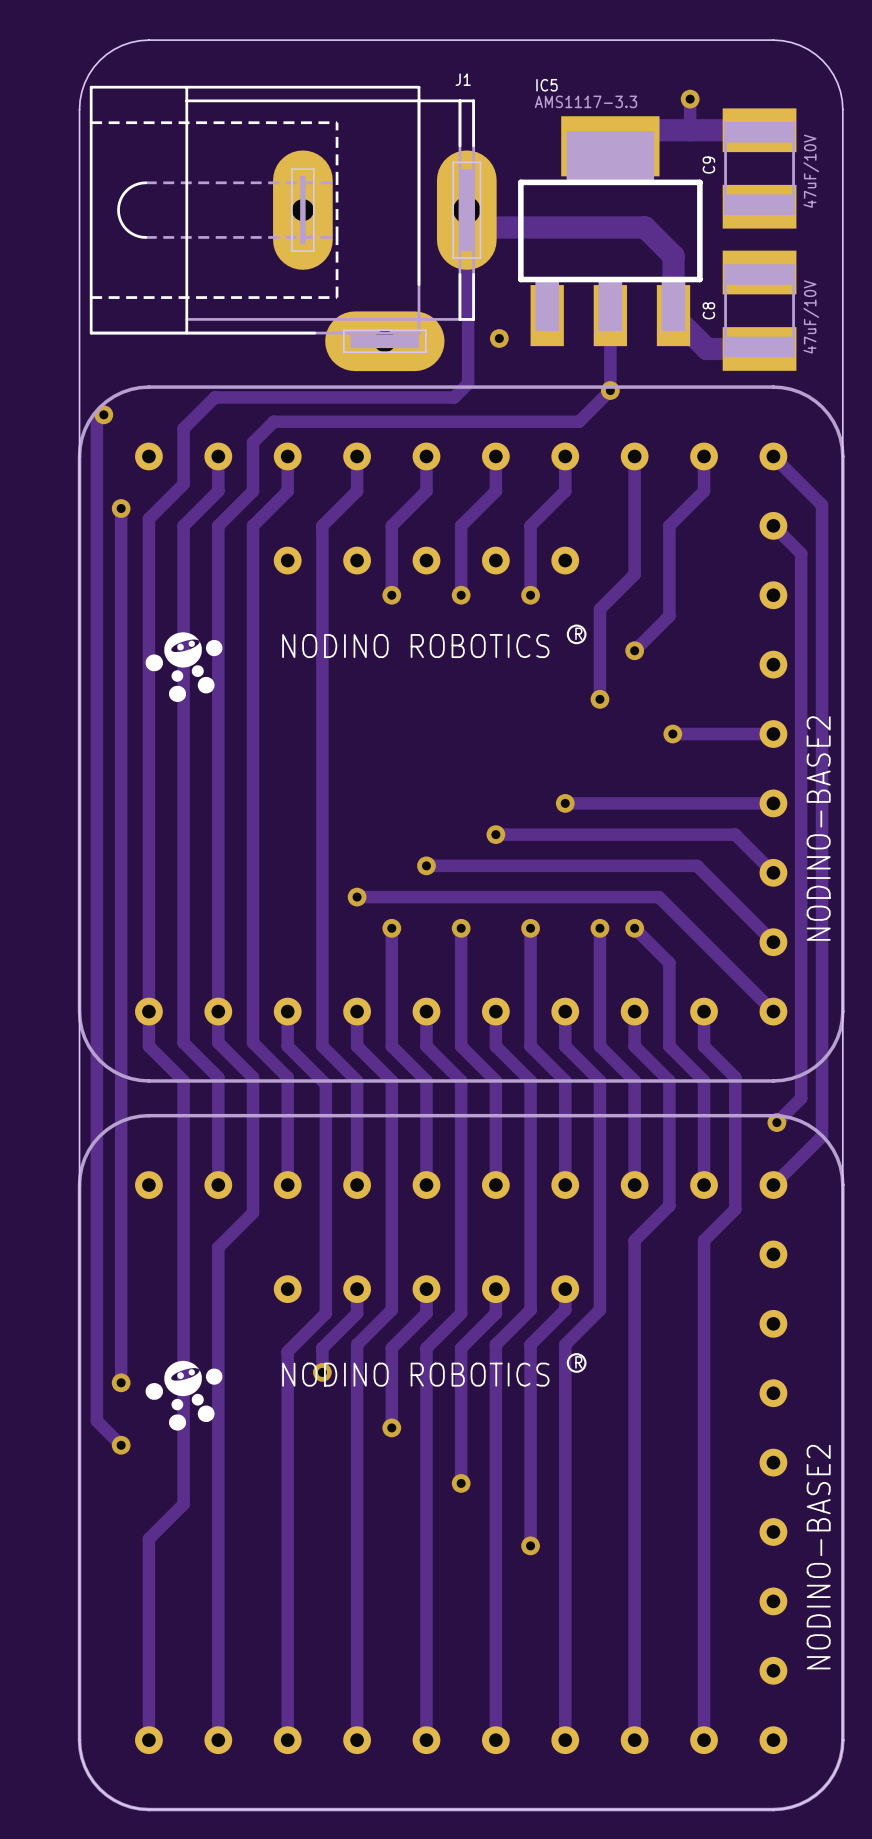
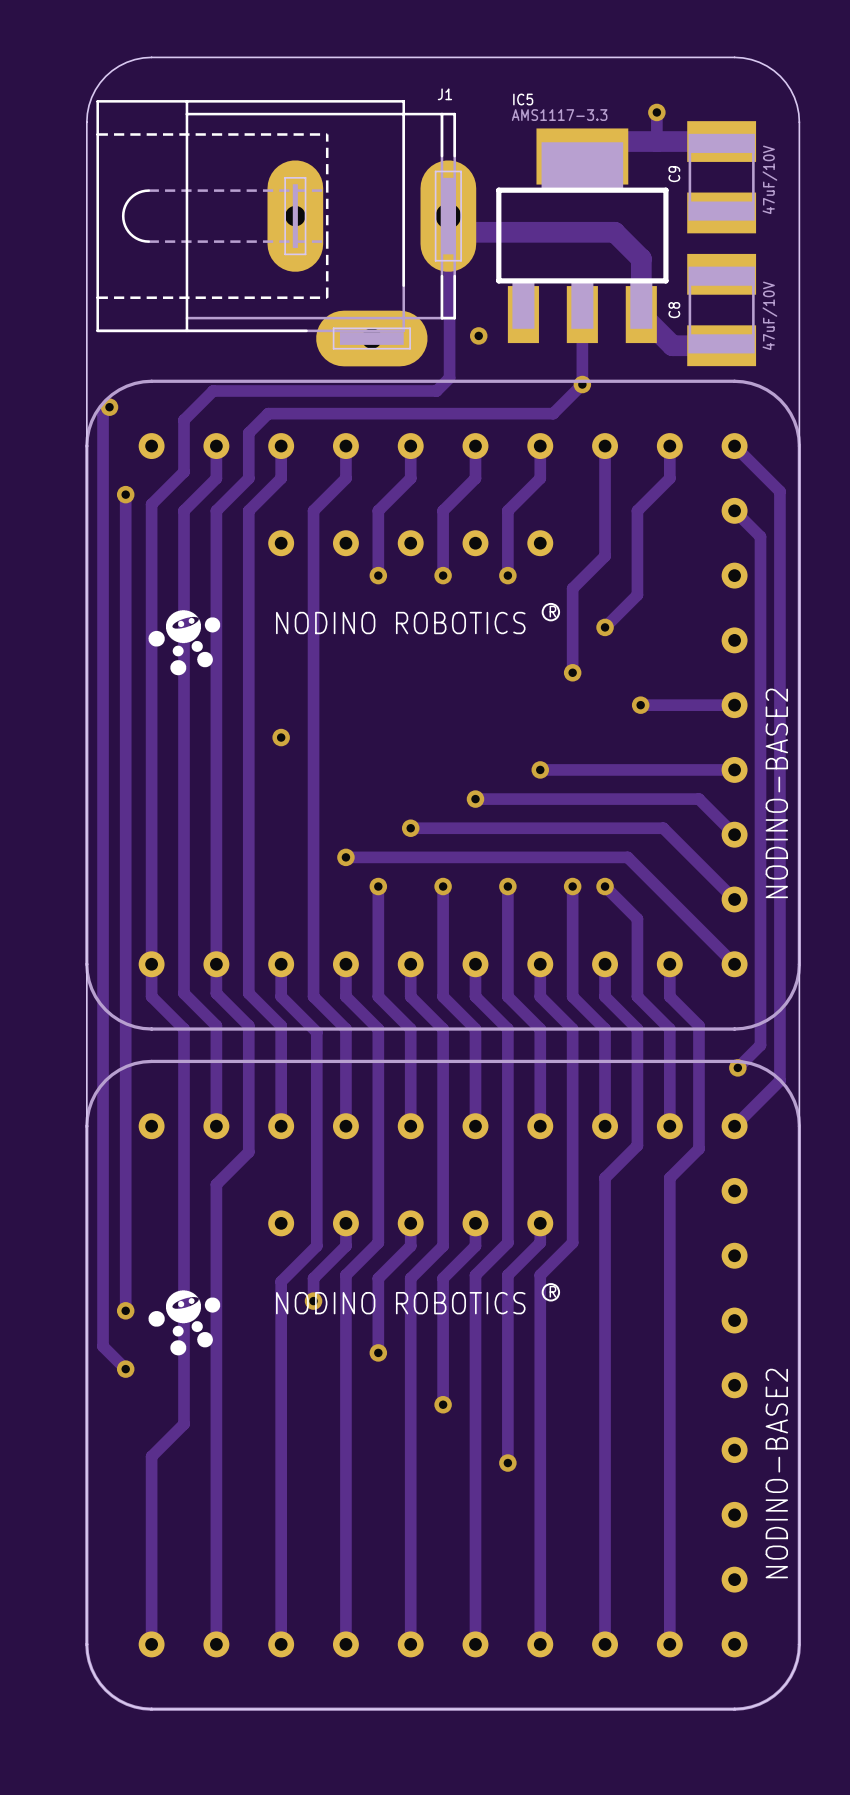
via: none -> (281, 737)

